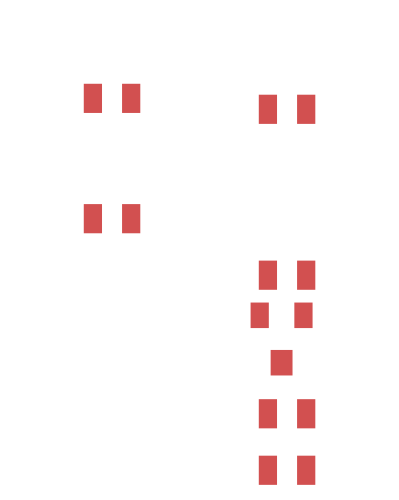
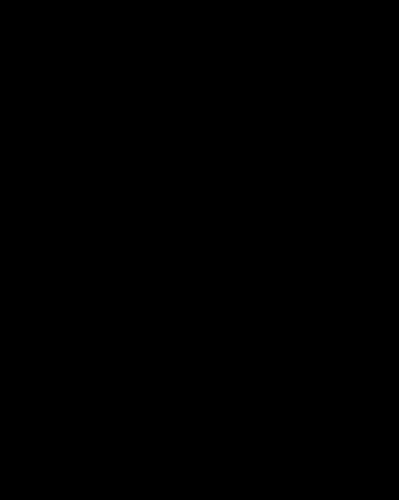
part: (112, 98) -> none
part: (287, 109) -> none
part: (112, 218) -> none
part: (287, 275) -> none
part: (281, 339) -> none
part: (287, 413) -> none
part: (287, 470) -> none

